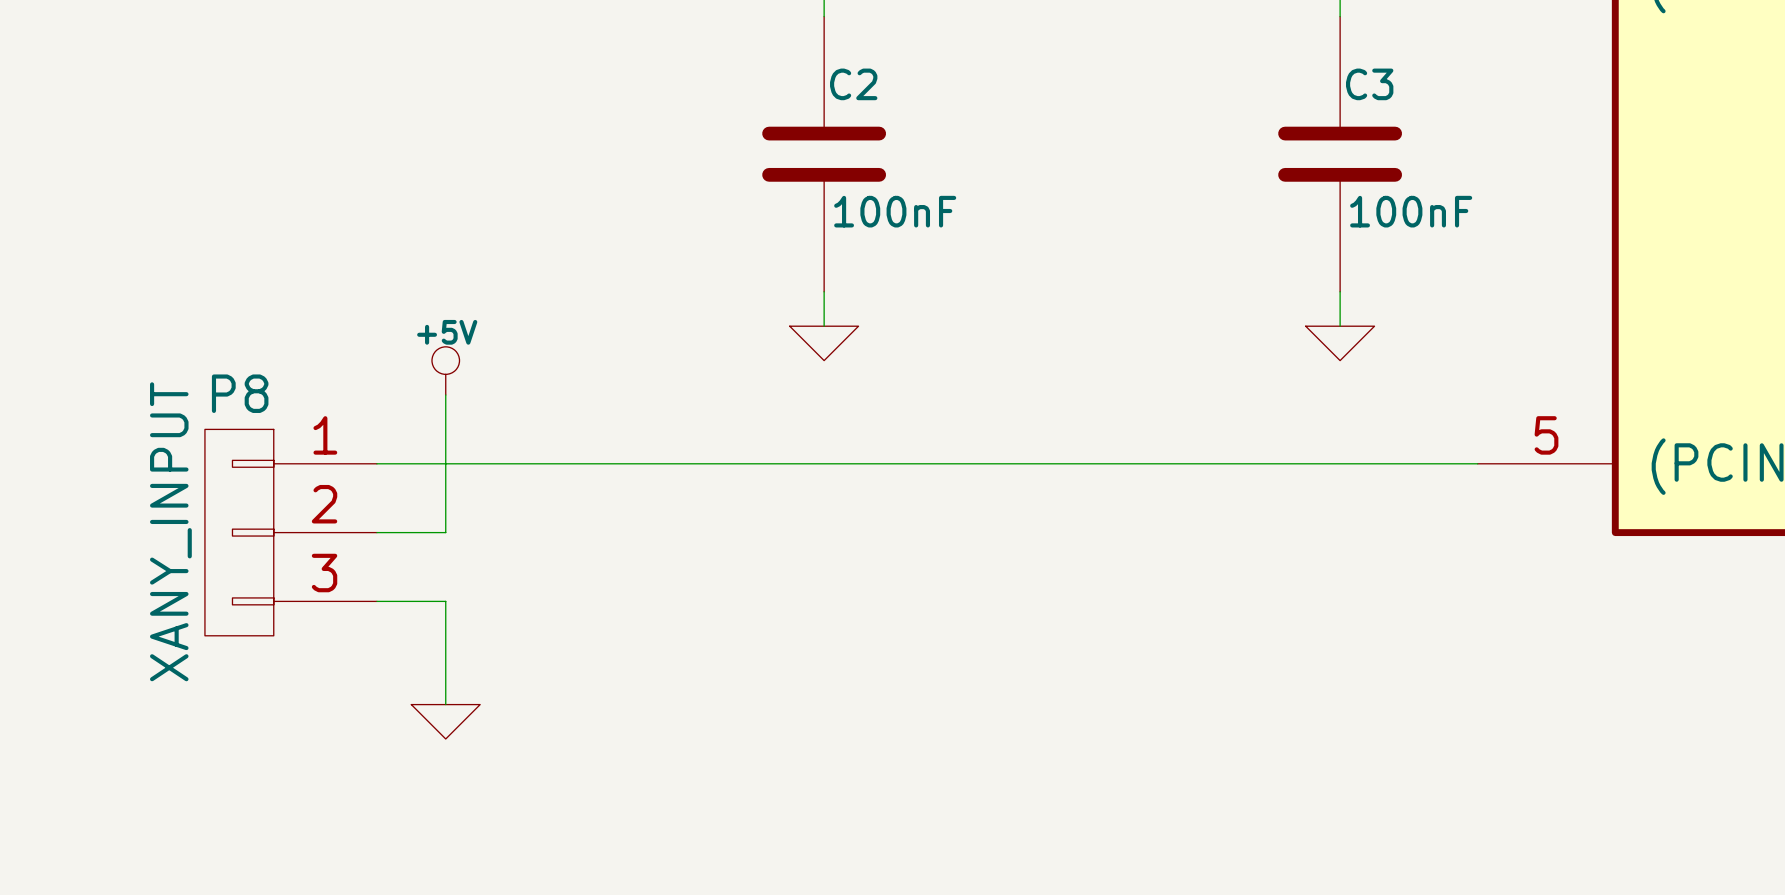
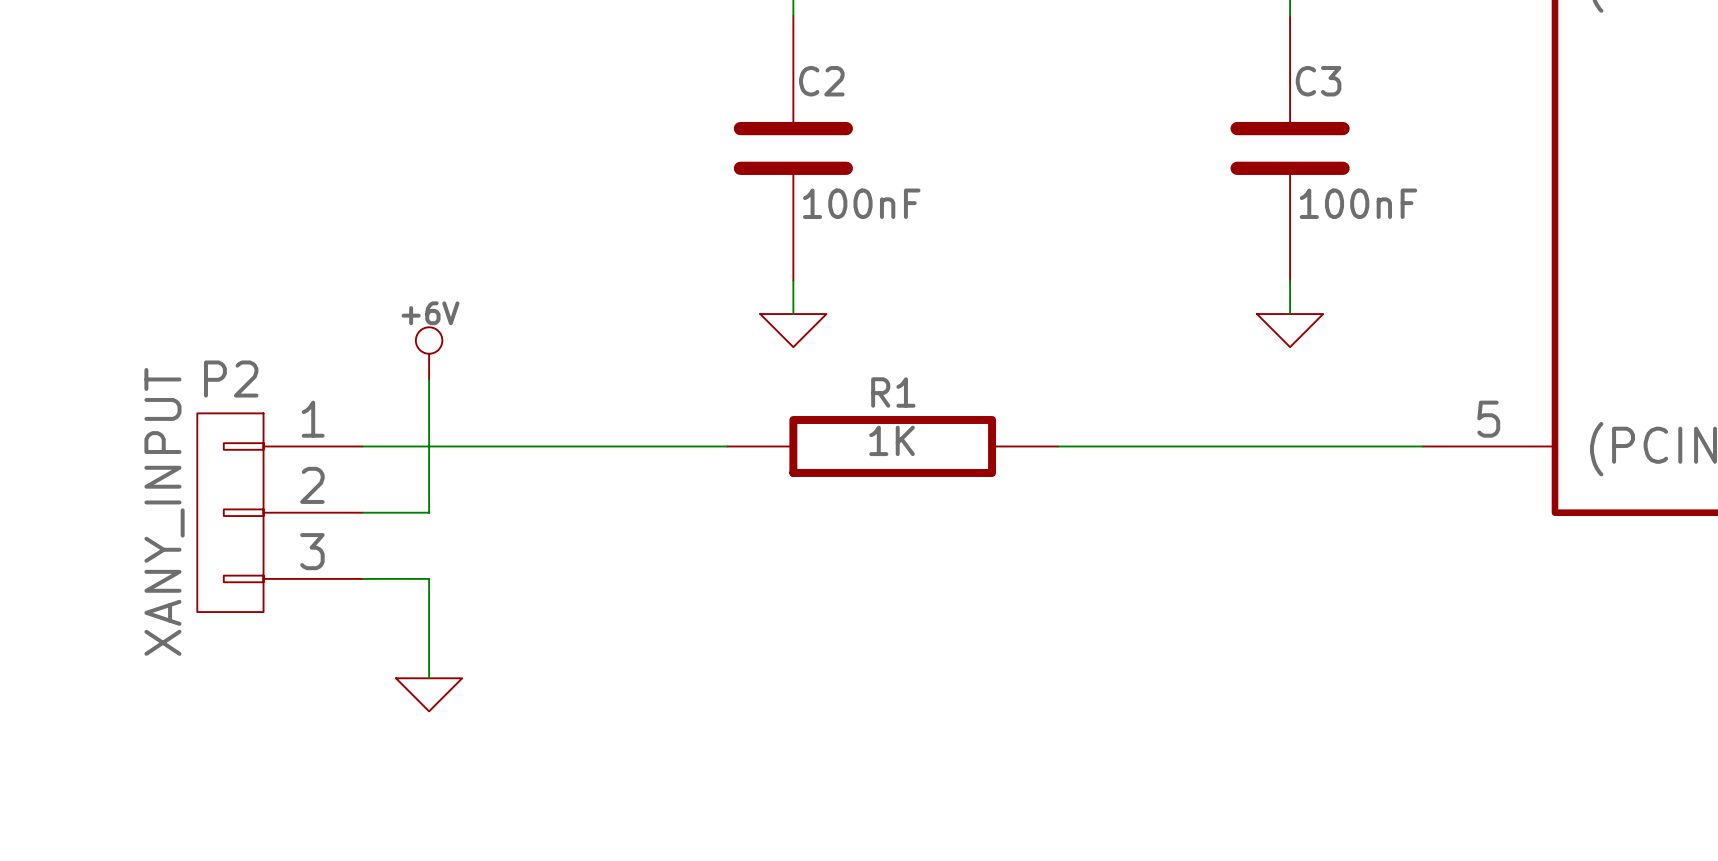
power symbol: +5V (445, 370) -> +6V (429, 353)
P8 name: P8 (240, 393) -> P2 (231, 379)
wire: (755, 463) (1099, 463) -> none
R1: none -> 1K (892, 446)

